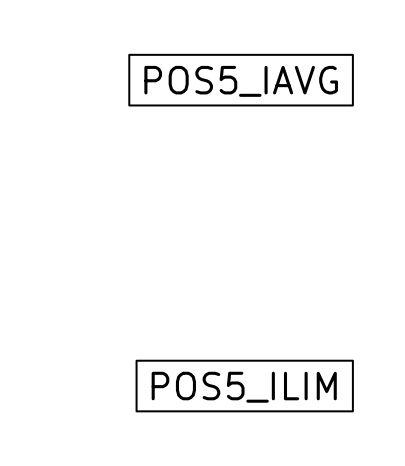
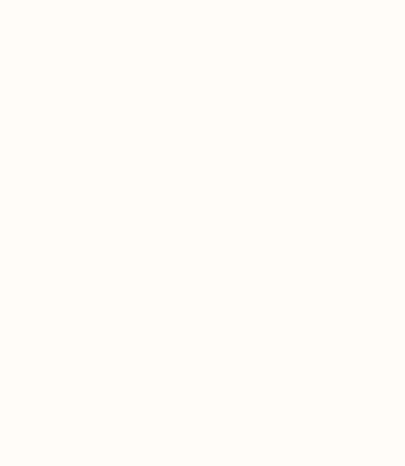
global label: POS5_IAVG (241, 81) -> none
global label: POS5_ILIM (244, 387) -> none

